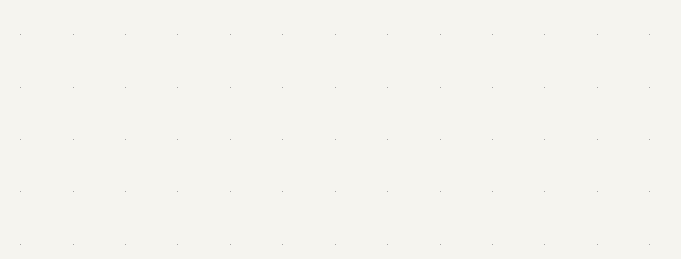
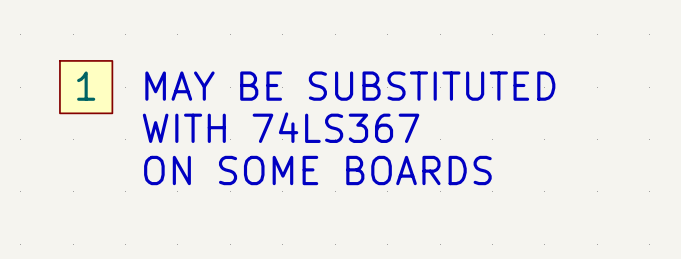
text: none -> MAY BE SUBSTITUTED (350, 86)
part: none -> 1 (86, 87)
text: none -> WITH 74LS367 (281, 127)
text: none -> ON SOME BOARDS (317, 170)

